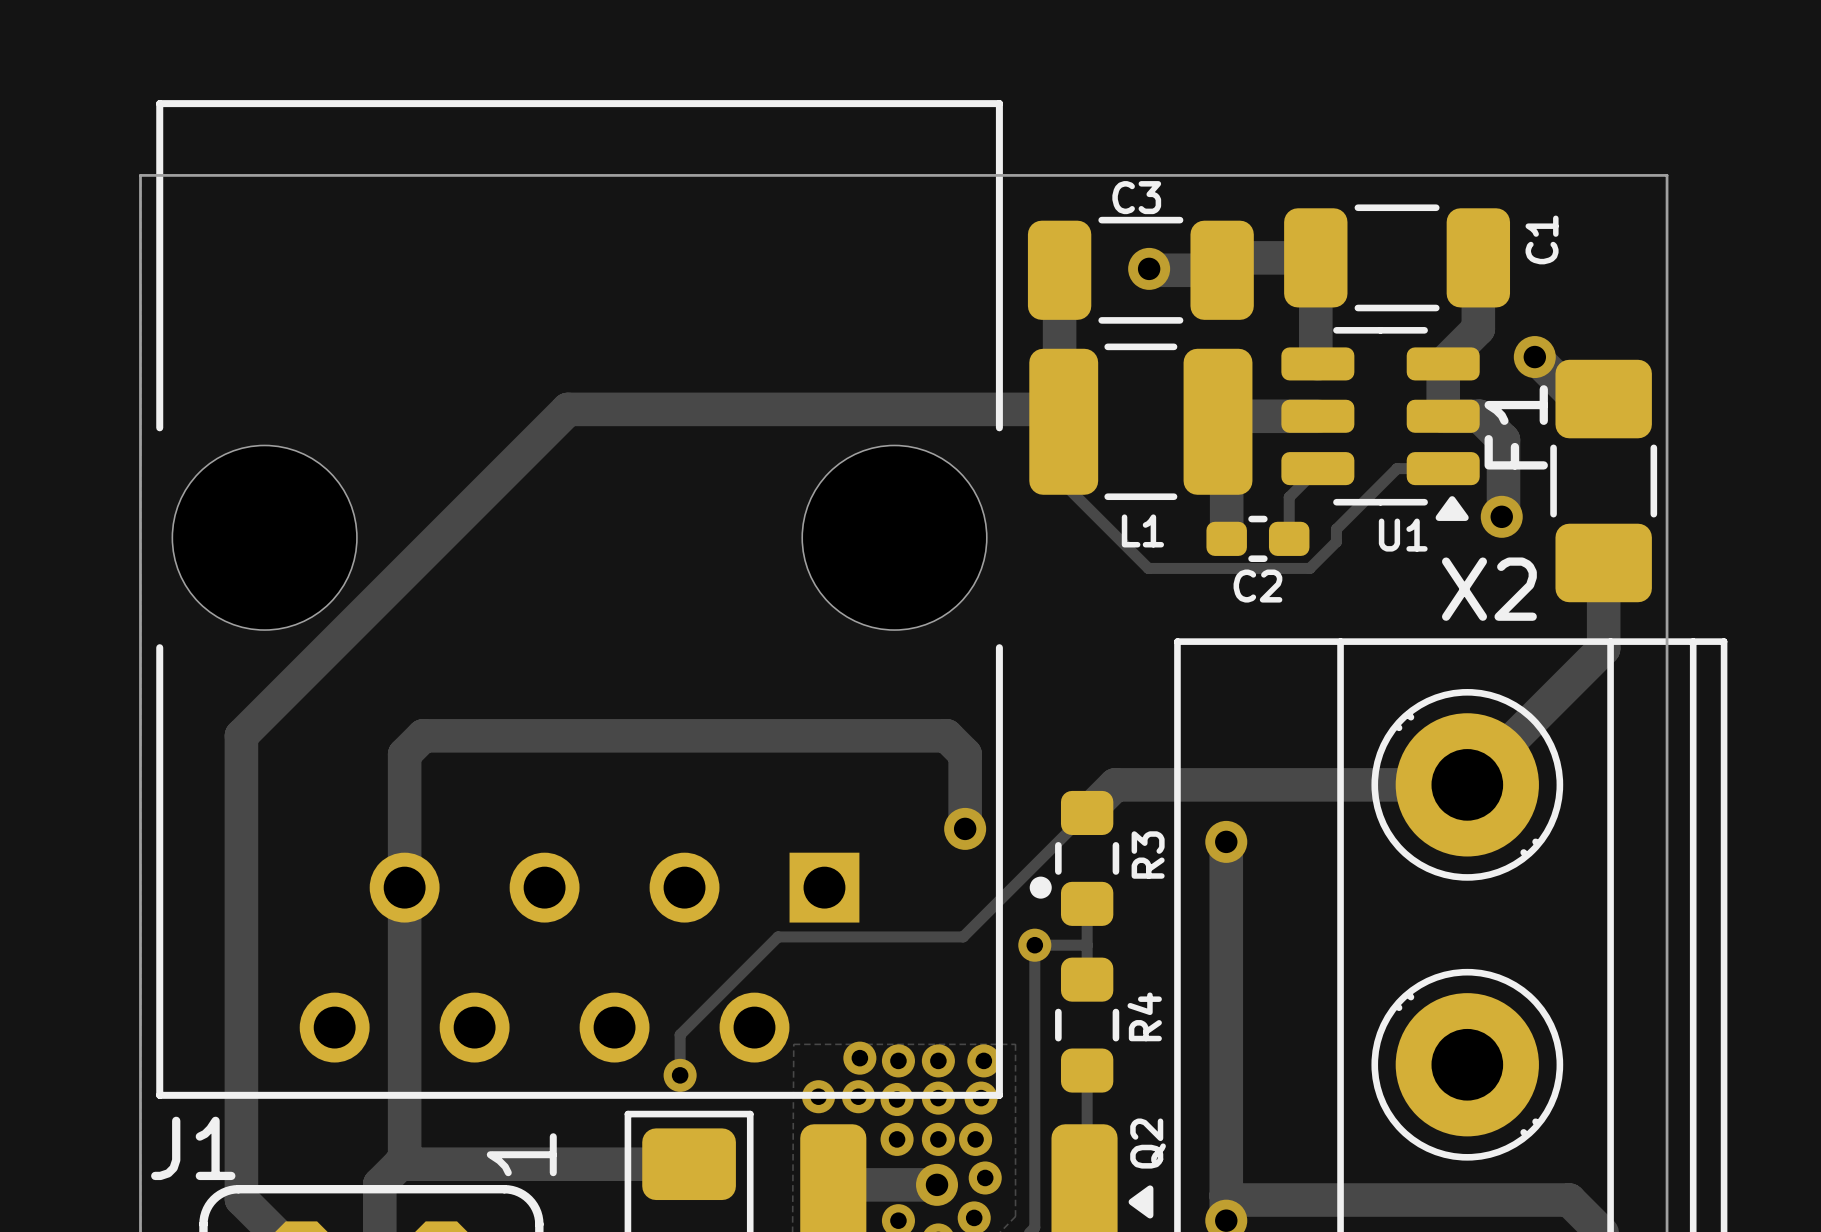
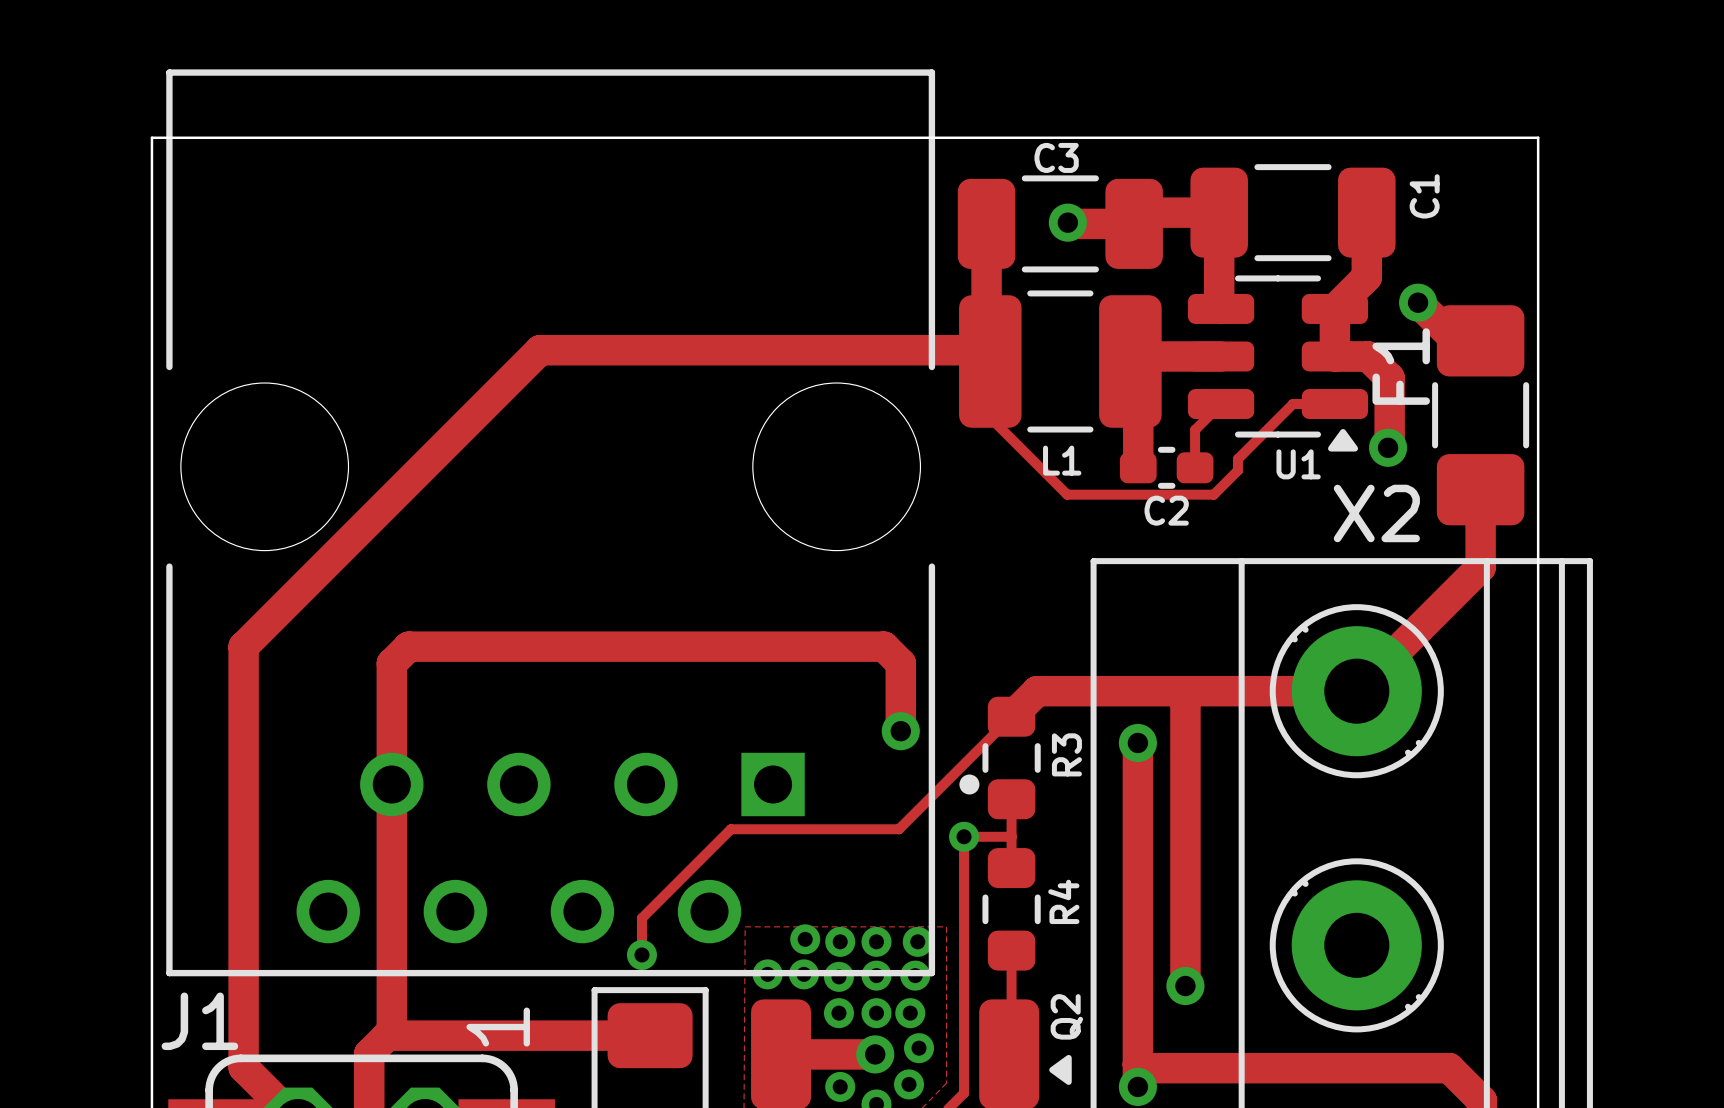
track: none -> (1182, 691) (1185, 693) (1185, 986)
via: none -> (1185, 986)

